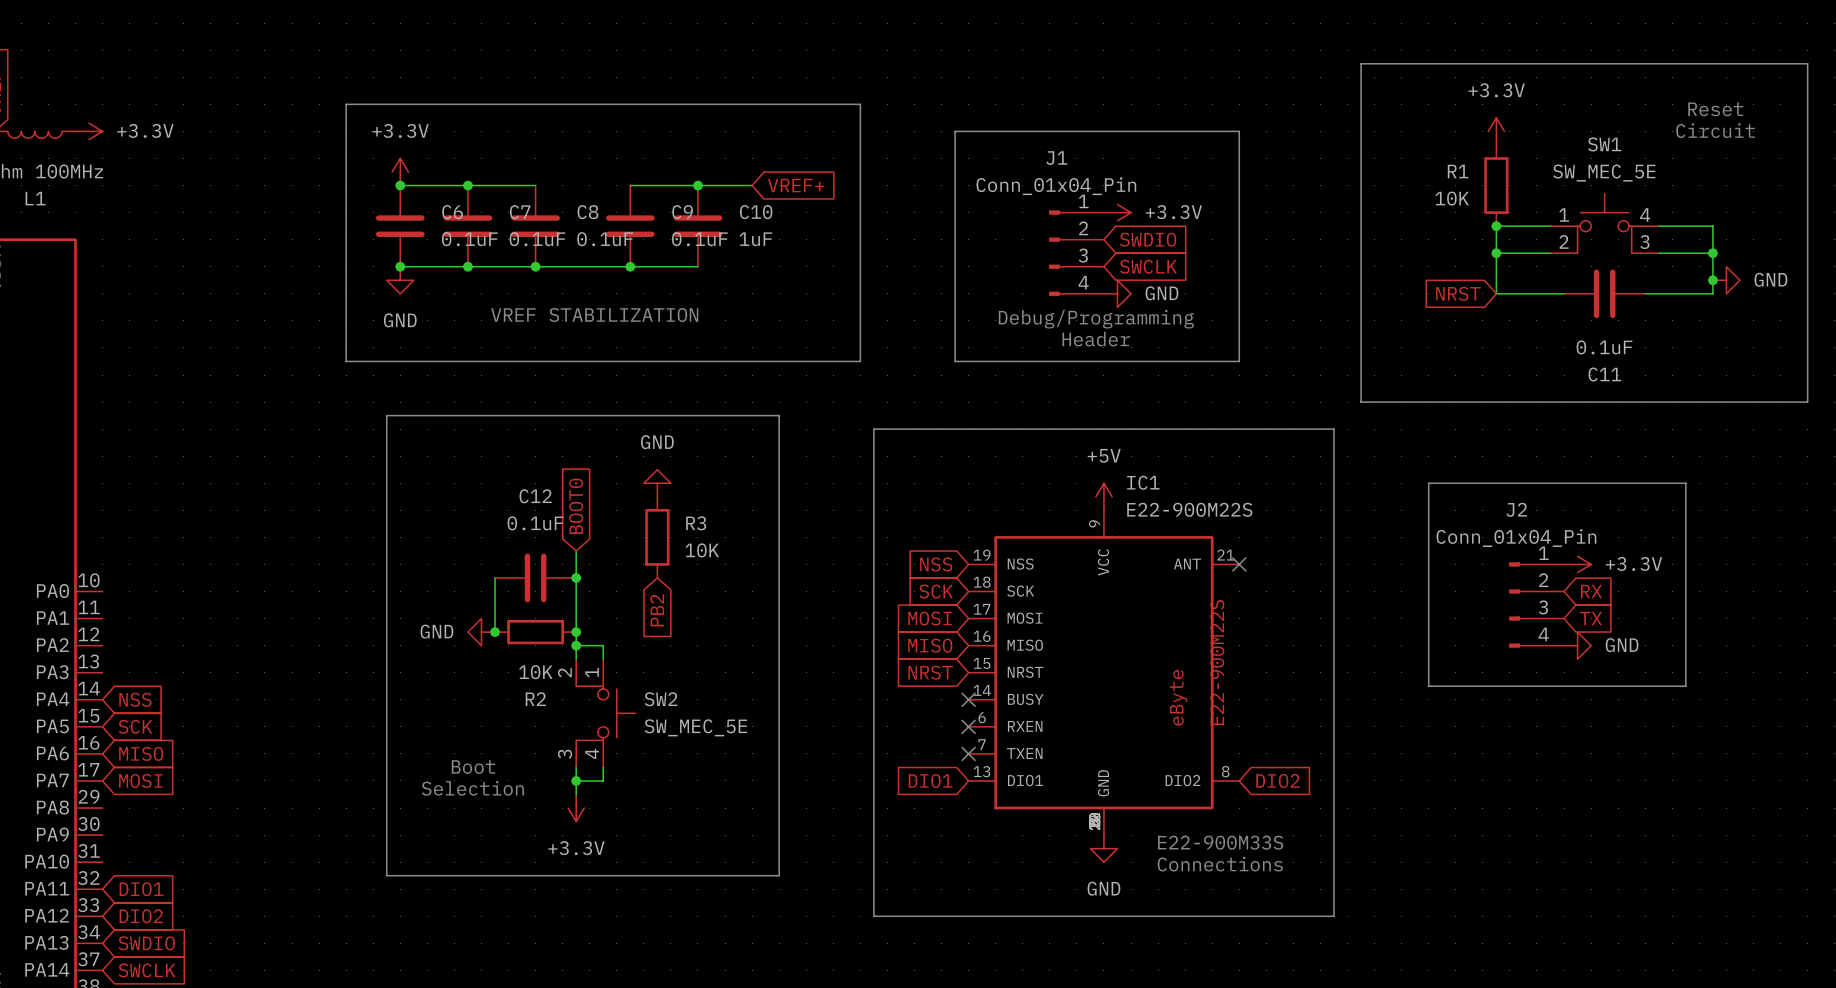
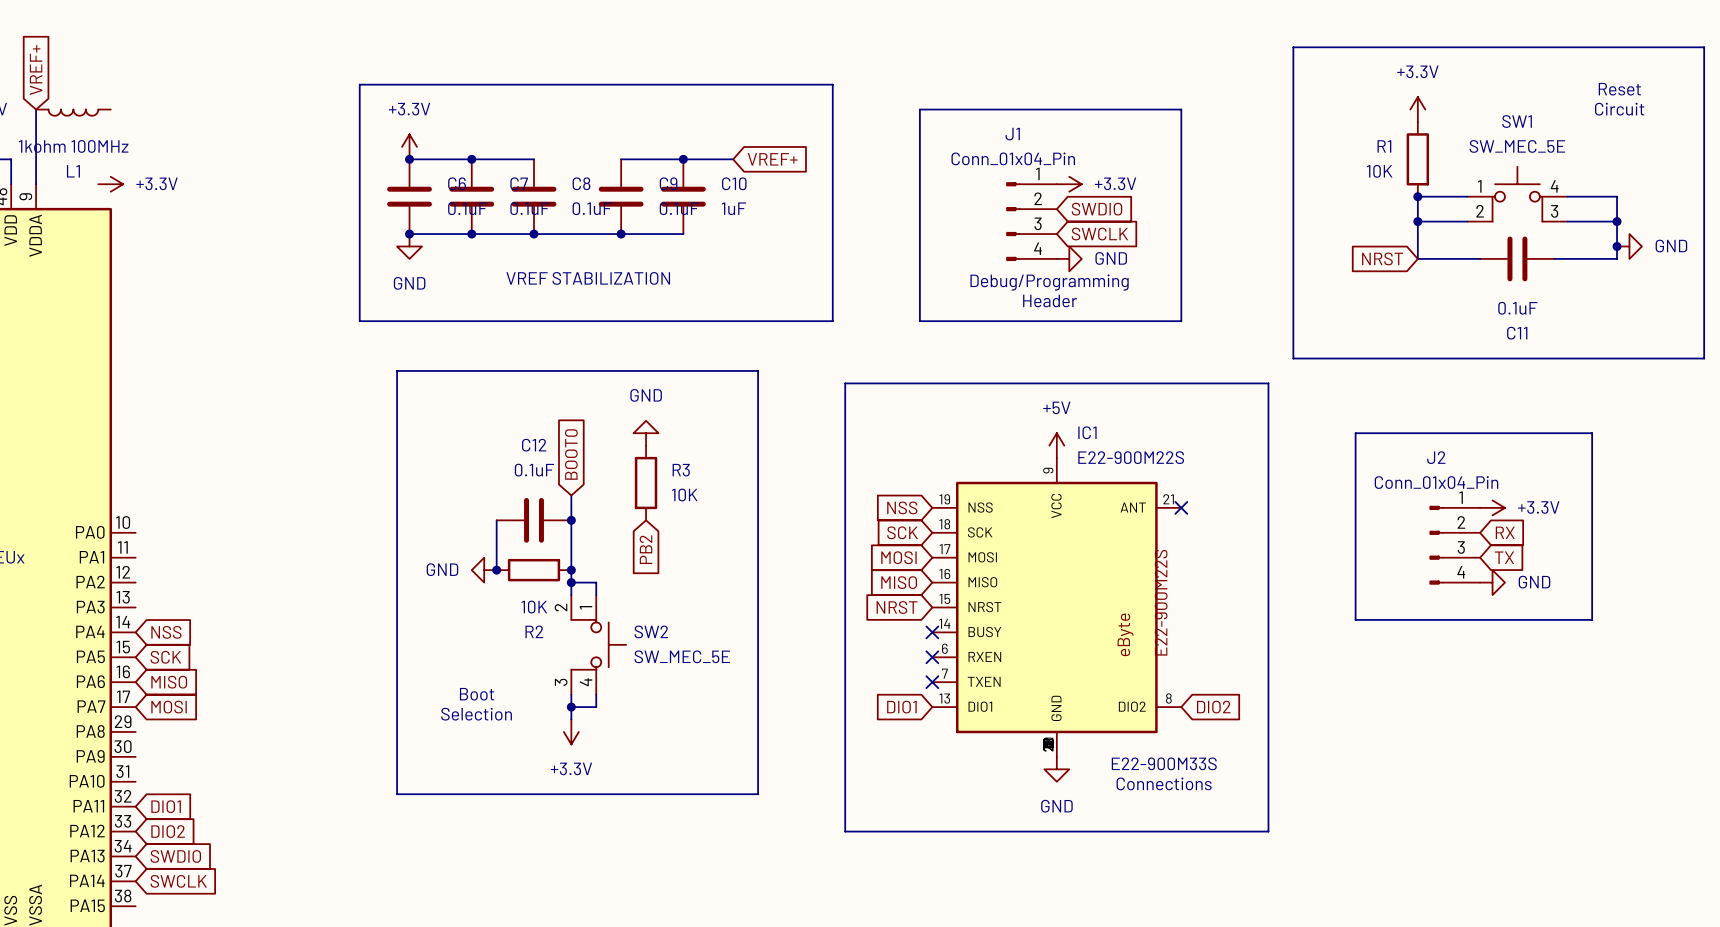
power symbol position: +3.3V (89, 131) -> +3.3V (110, 184)

